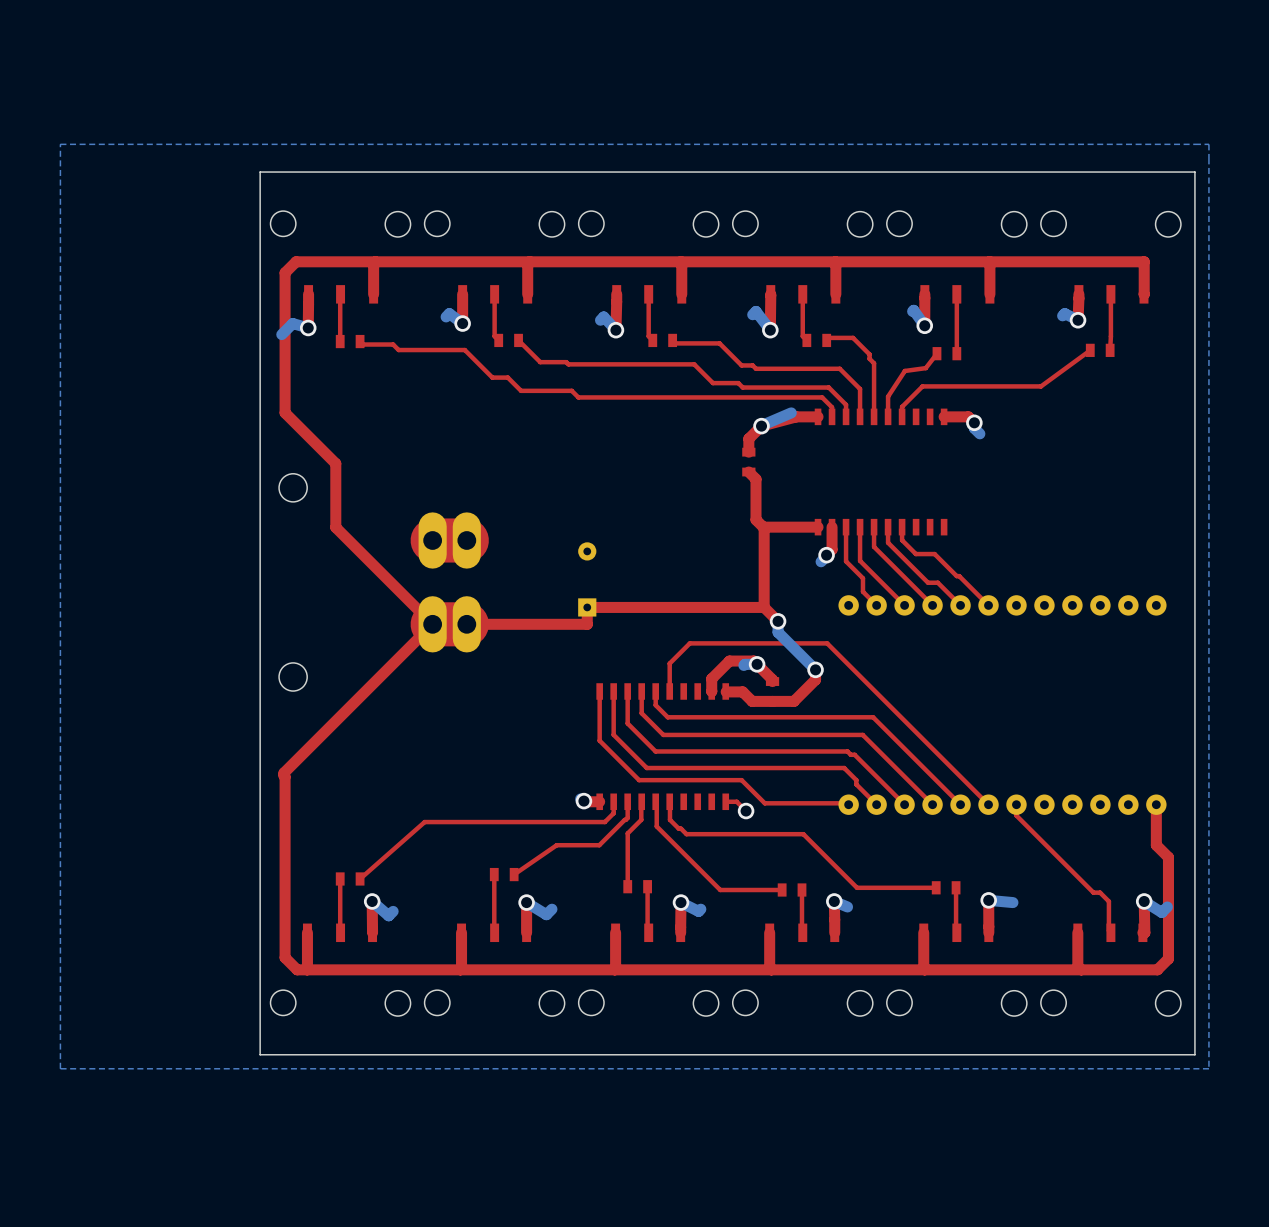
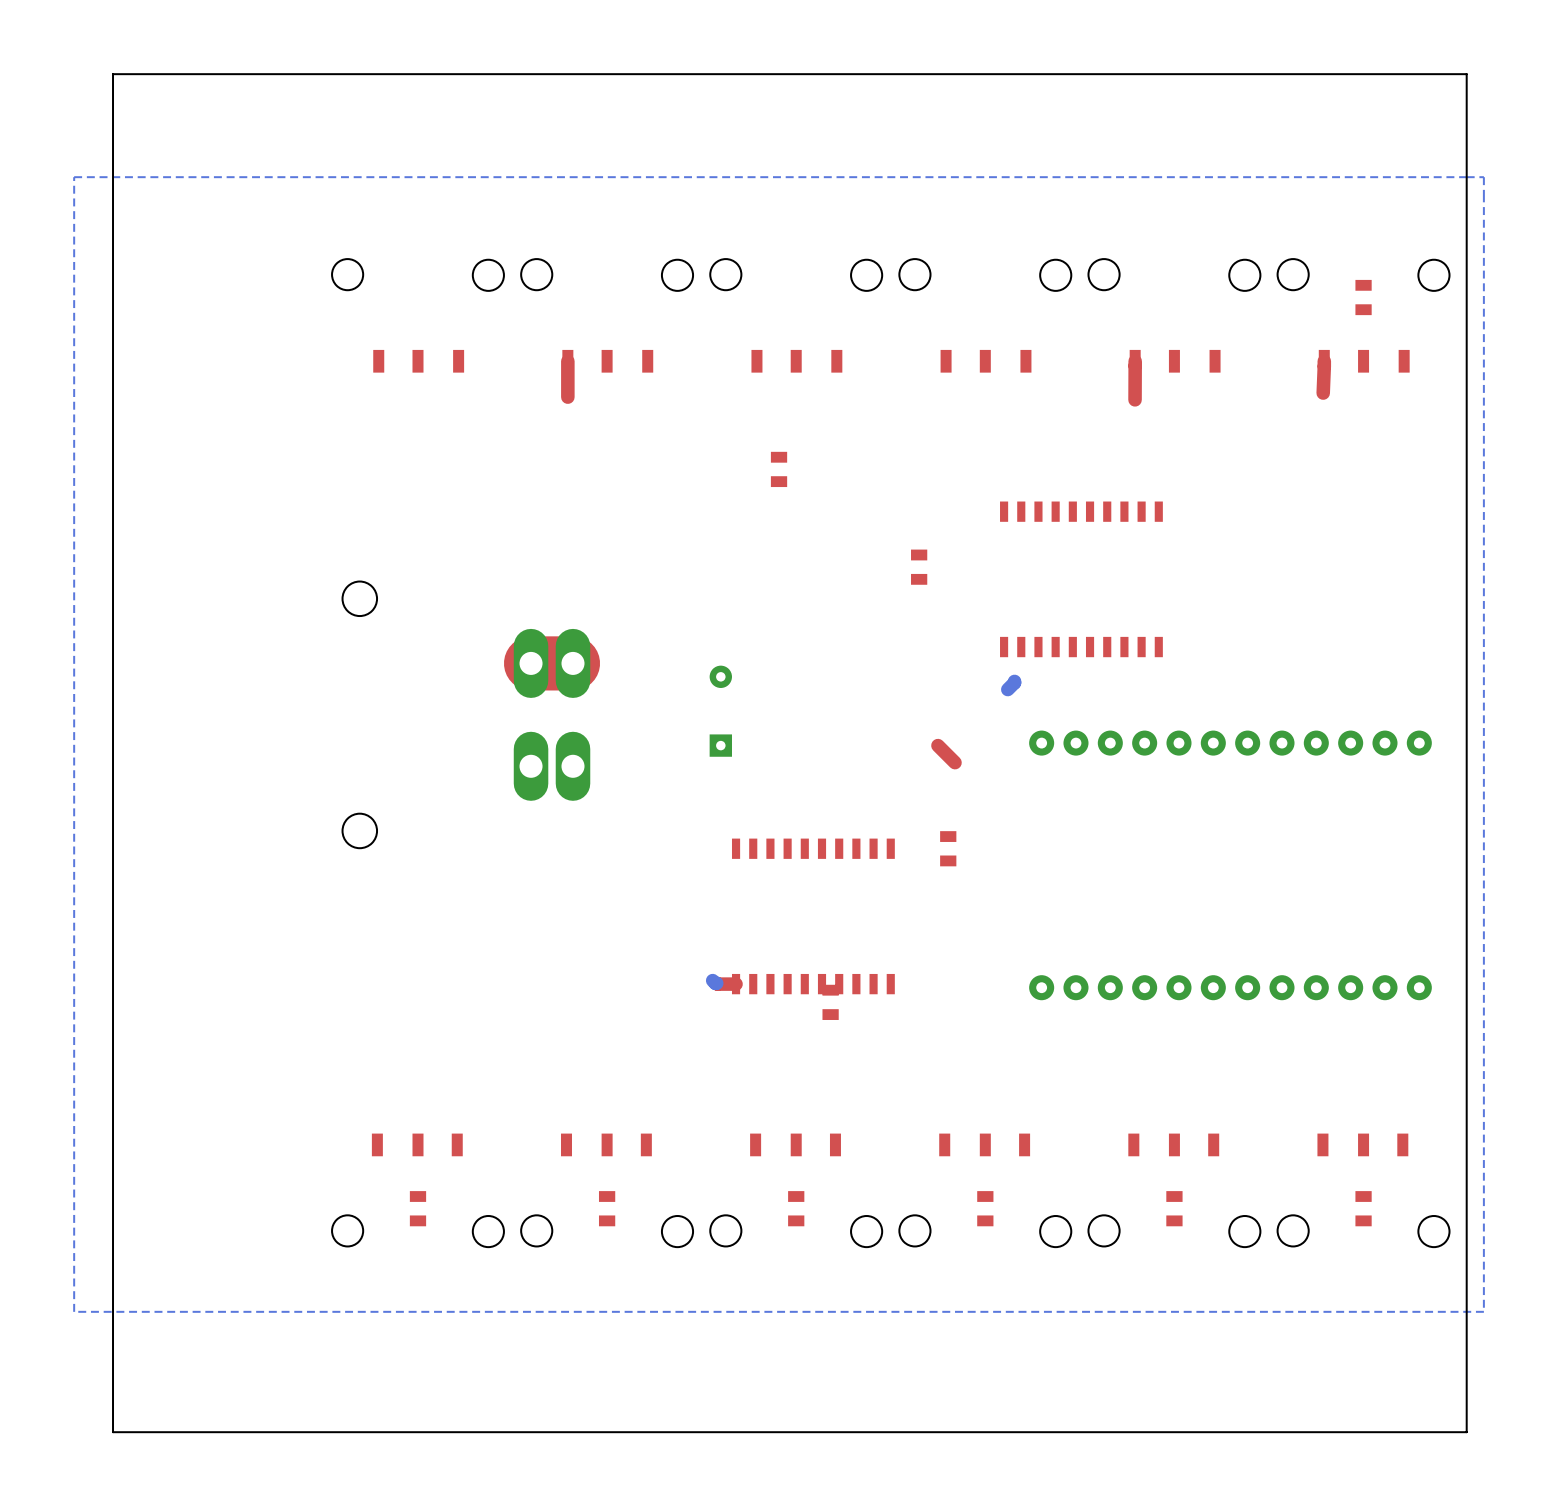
board edge: (1194, 172) (260, 172) (260, 1054) (1194, 1054) -> (1466, 211) (1466, 74) (113, 74) (113, 1432) (1466, 1432) (1466, 1294)
part: none -> (1363, 297)
top track: (375, 261) (373, 263) (373, 294) -> none
top track: (529, 261) (527, 264) (527, 294) -> none
top track: (681, 261) (681, 294) -> none
top track: (835, 261) (835, 294) -> none
top track: (989, 261) (989, 294) -> none
top track: (308, 294) (308, 327) -> none
top track: (340, 294) (340, 341) -> none
top track: (494, 294) (494, 336) (498, 340) -> none
top track: (616, 294) (615, 330) -> none
top track: (648, 294) (648, 336) (652, 340) -> none
top track: (770, 294) (770, 330) -> none
top track: (802, 294) (802, 336) (806, 340) -> none
top track: (956, 294) (956, 353) -> none
top track: (1110, 294) (1110, 350) -> none
top track: (1143, 294) (1144, 261) (296, 261) (285, 272) (285, 412) (335, 463) (335, 527) (432, 624) -> none
bottom track: (912, 311) (913, 310) (924, 325) -> none
bottom track: (752, 314) (756, 311) (770, 330) -> none
bottom track: (1062, 315) (1064, 313) (1078, 320) -> none
bottom track: (446, 316) (449, 313) (462, 323) -> none
bottom track: (600, 320) (603, 316) (615, 330) -> none
via: (1078, 320) -> none
via: (462, 323) -> none
via: (924, 325) -> none
bottom track: (308, 327) (292, 323) (281, 334) -> none
via: (308, 327) -> none
via: (615, 330) -> none
via: (770, 330) -> none
part: (508, 340) -> none
top track: (518, 340) (540, 362) (566, 362) (568, 364) (694, 364) (712, 383) (738, 383) (742, 387) (828, 387) (846, 404) (846, 416) -> none
part rotation: 0° (662, 340) -> 90° clockwise (779, 469)
part position: (662, 340) -> (779, 469)
top track: (672, 340) (675, 343) (719, 343) (741, 365) (752, 365) (756, 368) (839, 368) (860, 389) (860, 416) -> none
part: (816, 340) -> none
top track: (826, 340) (829, 337) (853, 337) (869, 354) (869, 358) (874, 363) (874, 416) -> none
part: (350, 341) -> none
top track: (360, 341) (363, 344) (393, 344) (398, 350) (464, 350) (492, 377) (507, 377) (521, 390) (571, 390) (578, 397) (822, 397) (832, 407) (832, 416) -> none
top track: (1090, 350) (1040, 386) (922, 386) (902, 406) (902, 416) -> none
part: (1100, 350) -> none
top track: (936, 353) (925, 368) (904, 370) (888, 396) (888, 416) -> none
part: (946, 353) -> none
bottom track: (791, 412) (761, 426) -> none
top track: (818, 416) (796, 416) (761, 426) (748, 438) (748, 452) -> none
top track: (944, 416) (968, 416) (974, 422) -> none
bottom track: (974, 422) (974, 428) (979, 433) -> none
via: (974, 422) -> none
via: (761, 426) -> none
top track: (748, 472) (756, 479) (756, 519) (763, 527) (818, 527) (764, 527) (764, 607) (587, 607) (587, 624) (432, 624) -> none
top track: (832, 527) (832, 549) (826, 555) -> none
top track: (846, 527) (846, 561) (862, 578) (862, 591) (876, 605) -> none
top track: (860, 527) (860, 560) (904, 605) -> none
top track: (874, 527) (874, 546) (932, 605) -> none
top track: (888, 527) (888, 542) (928, 582) (937, 582) (960, 605) -> none
top track: (902, 527) (902, 540) (915, 554) (934, 554) (988, 605) -> none
via: (826, 555) -> none
bottom track: (778, 621) (778, 632) (815, 669) -> none
via: (778, 621) -> none
top track: (432, 624) (283, 772) (285, 957) (297, 969) (1157, 969) (1168, 958) (1168, 857) (1156, 845) (1156, 804) -> none
bottom track: (757, 664) (743, 665) -> none
via: (757, 664) -> none
top track: (815, 669) (815, 679) (793, 701) (752, 701) (742, 691) (725, 691) -> none
via: (815, 669) -> none
top track: (772, 681) (753, 661) (729, 661) (711, 678) (711, 691) -> none
top track: (599, 691) (599, 740) (639, 780) (741, 780) (764, 803) (848, 804) -> none
top track: (613, 691) (613, 734) (646, 768) (844, 768) (856, 780) (856, 784) (876, 804) -> none
top track: (627, 691) (627, 723) (655, 751) (847, 751) (850, 754) (854, 754) (904, 804) -> none
top track: (641, 691) (641, 713) (663, 734) (862, 734) (932, 804) -> none
top track: (655, 691) (655, 705) (667, 717) (873, 717) (960, 804) -> none
top track: (669, 691) (669, 663) (689, 643) (827, 643) (988, 804) -> none
via: (583, 801) -> none
top track: (613, 801) (613, 813) (604, 822) (424, 822) (360, 878) -> none
top track: (627, 801) (627, 818) (599, 845) (556, 845) (514, 874) -> none
top track: (641, 801) (641, 819) (627, 833) (627, 886) -> none
top track: (655, 801) (656, 826) (720, 890) (782, 890) -> none
top track: (669, 801) (669, 819) (686, 834) (803, 834) (857, 887) (936, 887) -> none
top track: (725, 801) (736, 801) (746, 811) -> none
top track: (1016, 804) (1016, 815) (1093, 892) (1100, 892) (1108, 901) (1108, 930) (1110, 932) -> none
via: (746, 811) -> none
part: none -> (830, 1002)
top track: (494, 874) (494, 932) -> none
part: (504, 874) -> none
top track: (340, 878) (340, 932) -> none
part: (350, 878) -> none
part: (637, 886) -> none
top track: (647, 886) (648, 932) -> none
part: (946, 887) -> none
top track: (956, 887) (956, 932) -> none
part: (792, 890) -> none
top track: (801, 890) (802, 932) -> none
top track: (988, 900) (988, 932) -> none
bottom track: (988, 900) (1012, 902) -> none
via: (988, 900) -> none
top track: (372, 901) (372, 932) -> none
bottom track: (372, 901) (388, 915) (393, 911) -> none
via: (372, 901) -> none
top track: (834, 901) (834, 932) -> none
bottom track: (834, 901) (847, 906) -> none
via: (834, 901) -> none
top track: (1144, 901) (1144, 932) (1142, 932) -> none
bottom track: (1144, 901) (1161, 912) (1167, 906) -> none
via: (1144, 901) -> none
top track: (526, 902) (526, 932) -> none
bottom track: (526, 902) (546, 914) (551, 909) -> none
via: (526, 902) -> none
top track: (681, 902) (680, 932) -> none
bottom track: (681, 902) (698, 911) (700, 909) -> none
via: (681, 902) -> none
top track: (307, 932) (307, 969) -> none
top track: (461, 932) (460, 969) -> none
top track: (615, 932) (614, 969) -> none
top track: (769, 932) (769, 968) (771, 969) -> none
top track: (923, 932) (924, 969) -> none
top track: (1077, 932) (1077, 966) (1081, 969) -> none
part: none -> (417, 1208)
part: none -> (607, 1208)
part: none -> (796, 1208)
part: none -> (985, 1208)
part: none -> (1174, 1208)
part: none -> (1363, 1208)

